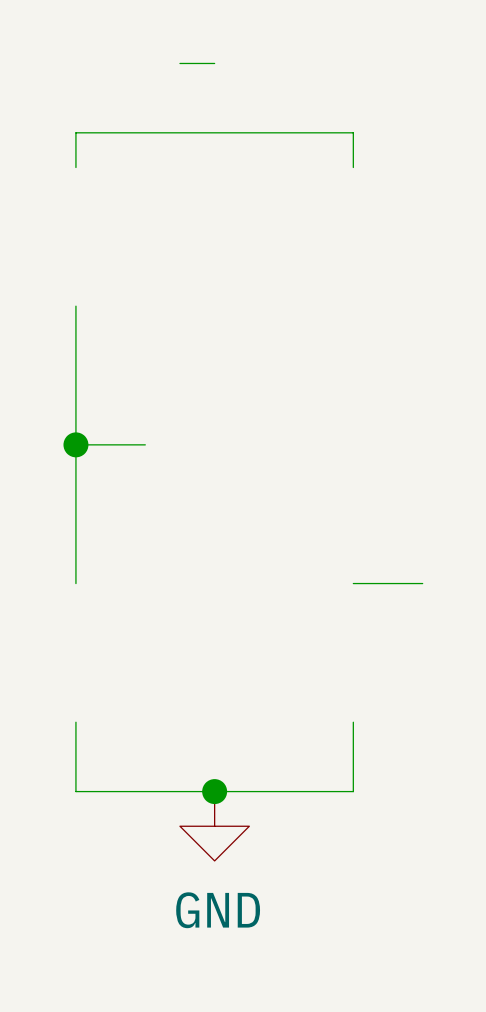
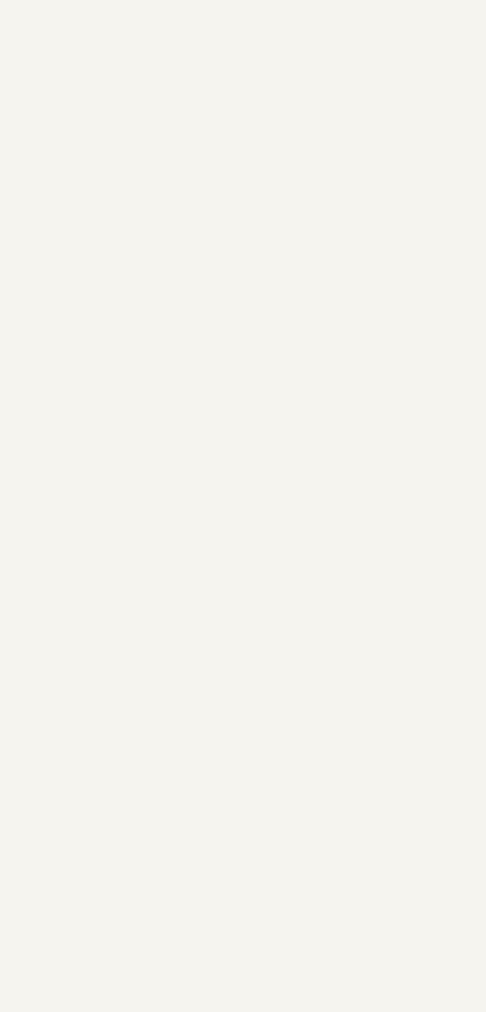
wire: (179, 63) (214, 63) -> none
wire: (75, 167) (75, 132) (353, 132) (353, 167) -> none
wire: (75, 306) (75, 583) -> none
wire: (75, 444) (145, 444) -> none
junction: (75, 444) -> none
wire: (353, 583) (422, 583) -> none
wire: (75, 722) (75, 791) (353, 791) (353, 722) -> none
junction: (214, 791) -> none
power symbol: GND (214, 826) -> none

